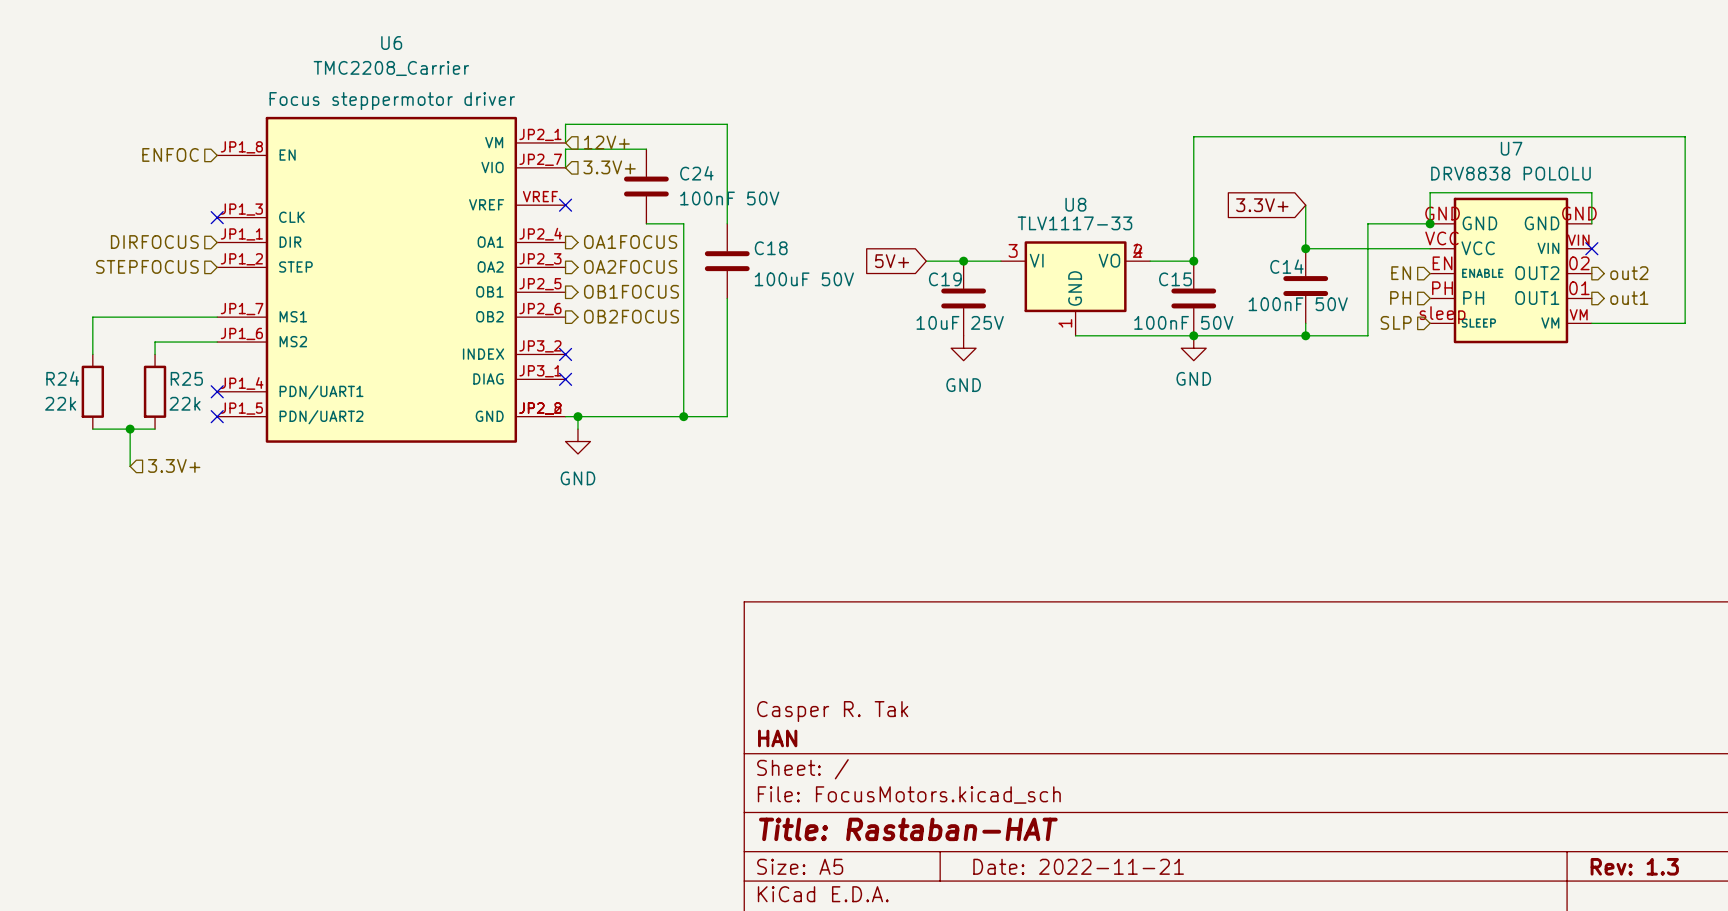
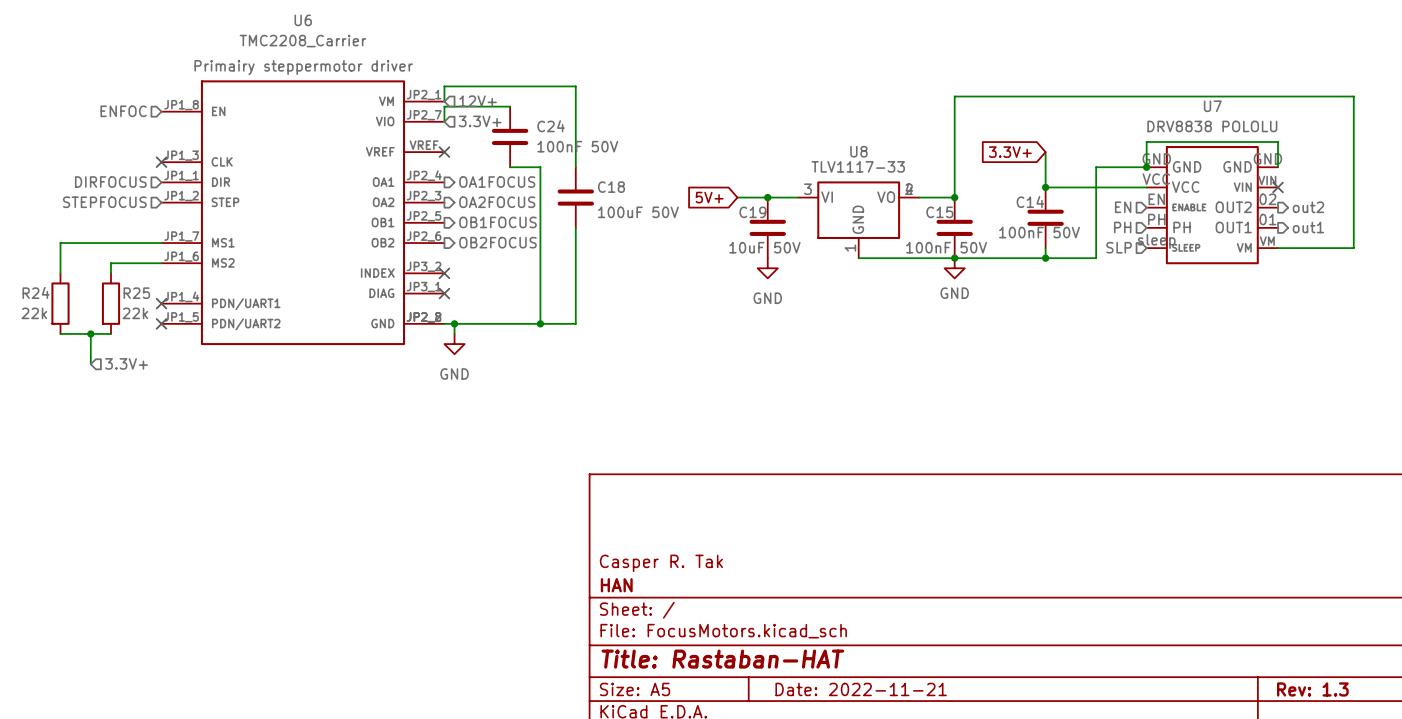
U6 text: Focus steppermotor driver (392, 101) -> Primairy steppermotor driver (303, 67)
C19 value: 10uF 25V (960, 322) -> 10uF 50V (764, 247)

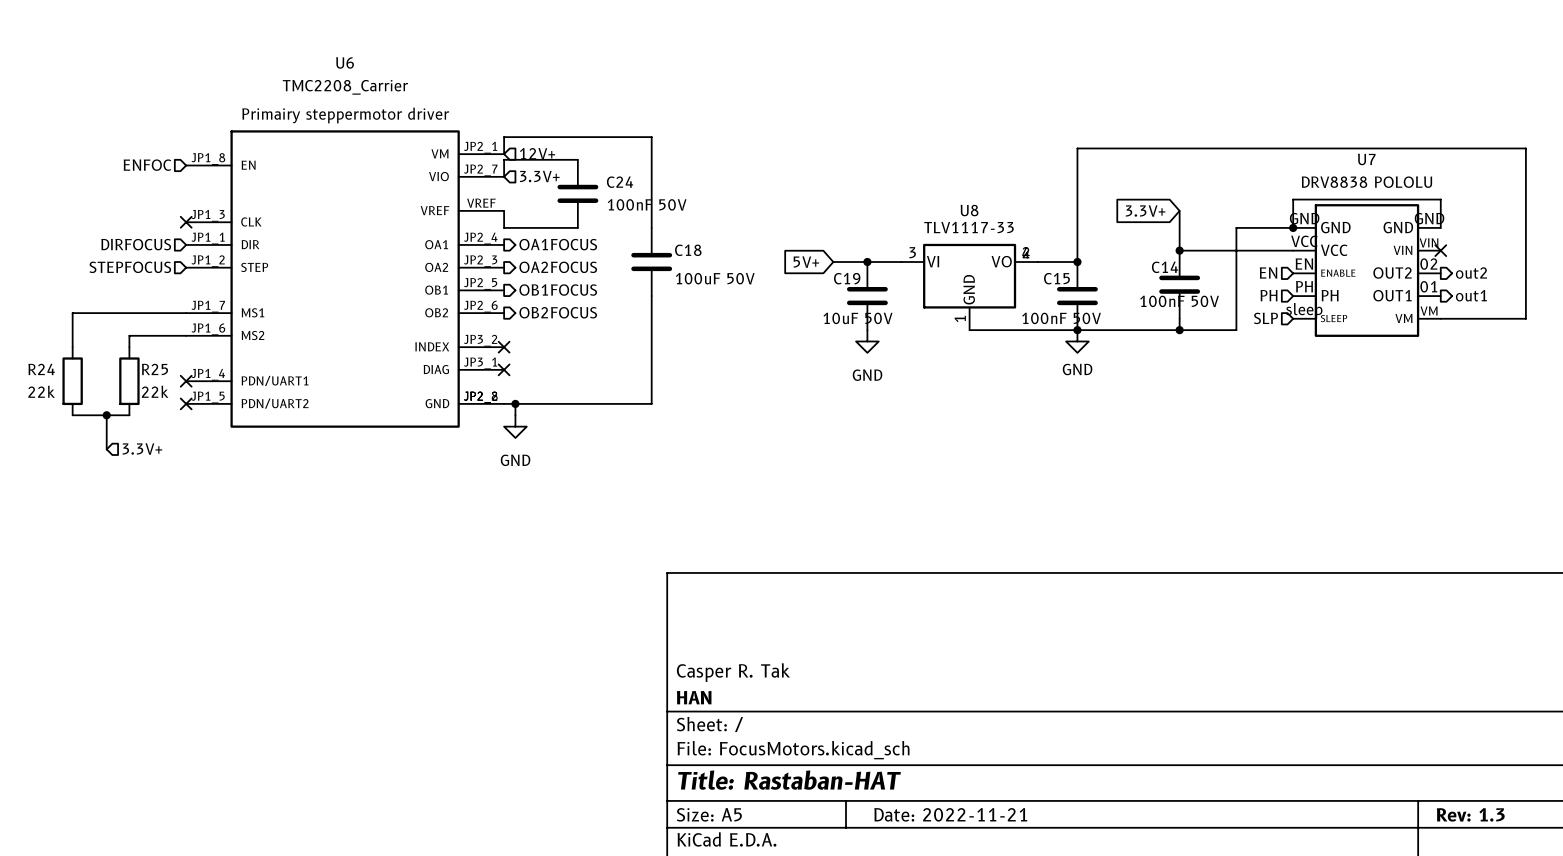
no-connect mark: (444, 152) -> none
wire: (510, 167) (540, 167) (540, 323) -> (577, 227) (504, 227) (504, 210)
junction: (540, 323) -> none

